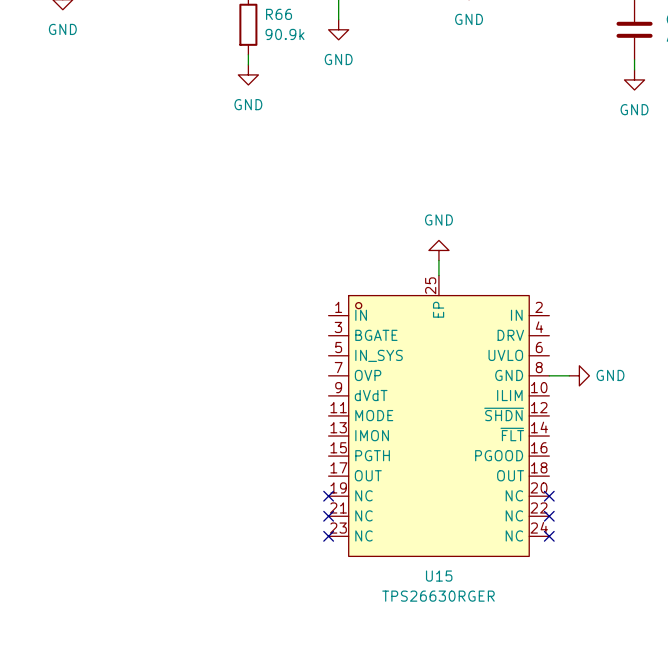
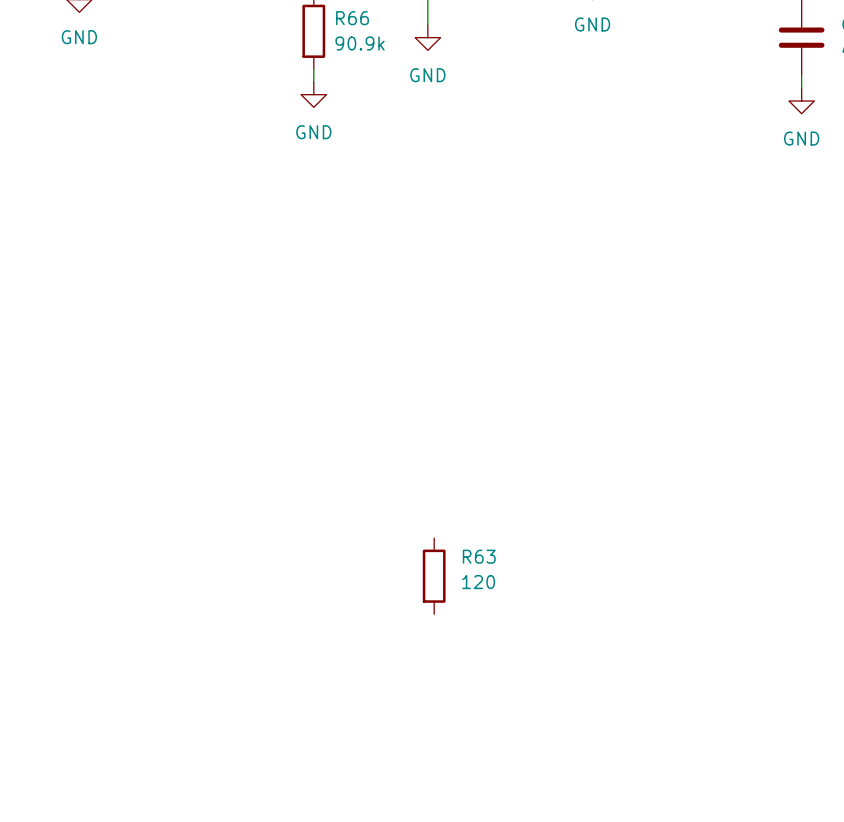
power symbol: GND (438, 250) -> none
wire: (438, 260) (438, 275) -> none
wire: (549, 375) (569, 375) -> none
power symbol: GND (579, 375) -> none
U15: TPS26630RGER (438, 415) -> none
R63: none -> 120 (434, 576)
no-connect mark: (328, 496) -> none
no-connect mark: (549, 496) -> none
no-connect mark: (328, 516) -> none
no-connect mark: (549, 516) -> none
no-connect mark: (328, 536) -> none
no-connect mark: (549, 536) -> none

